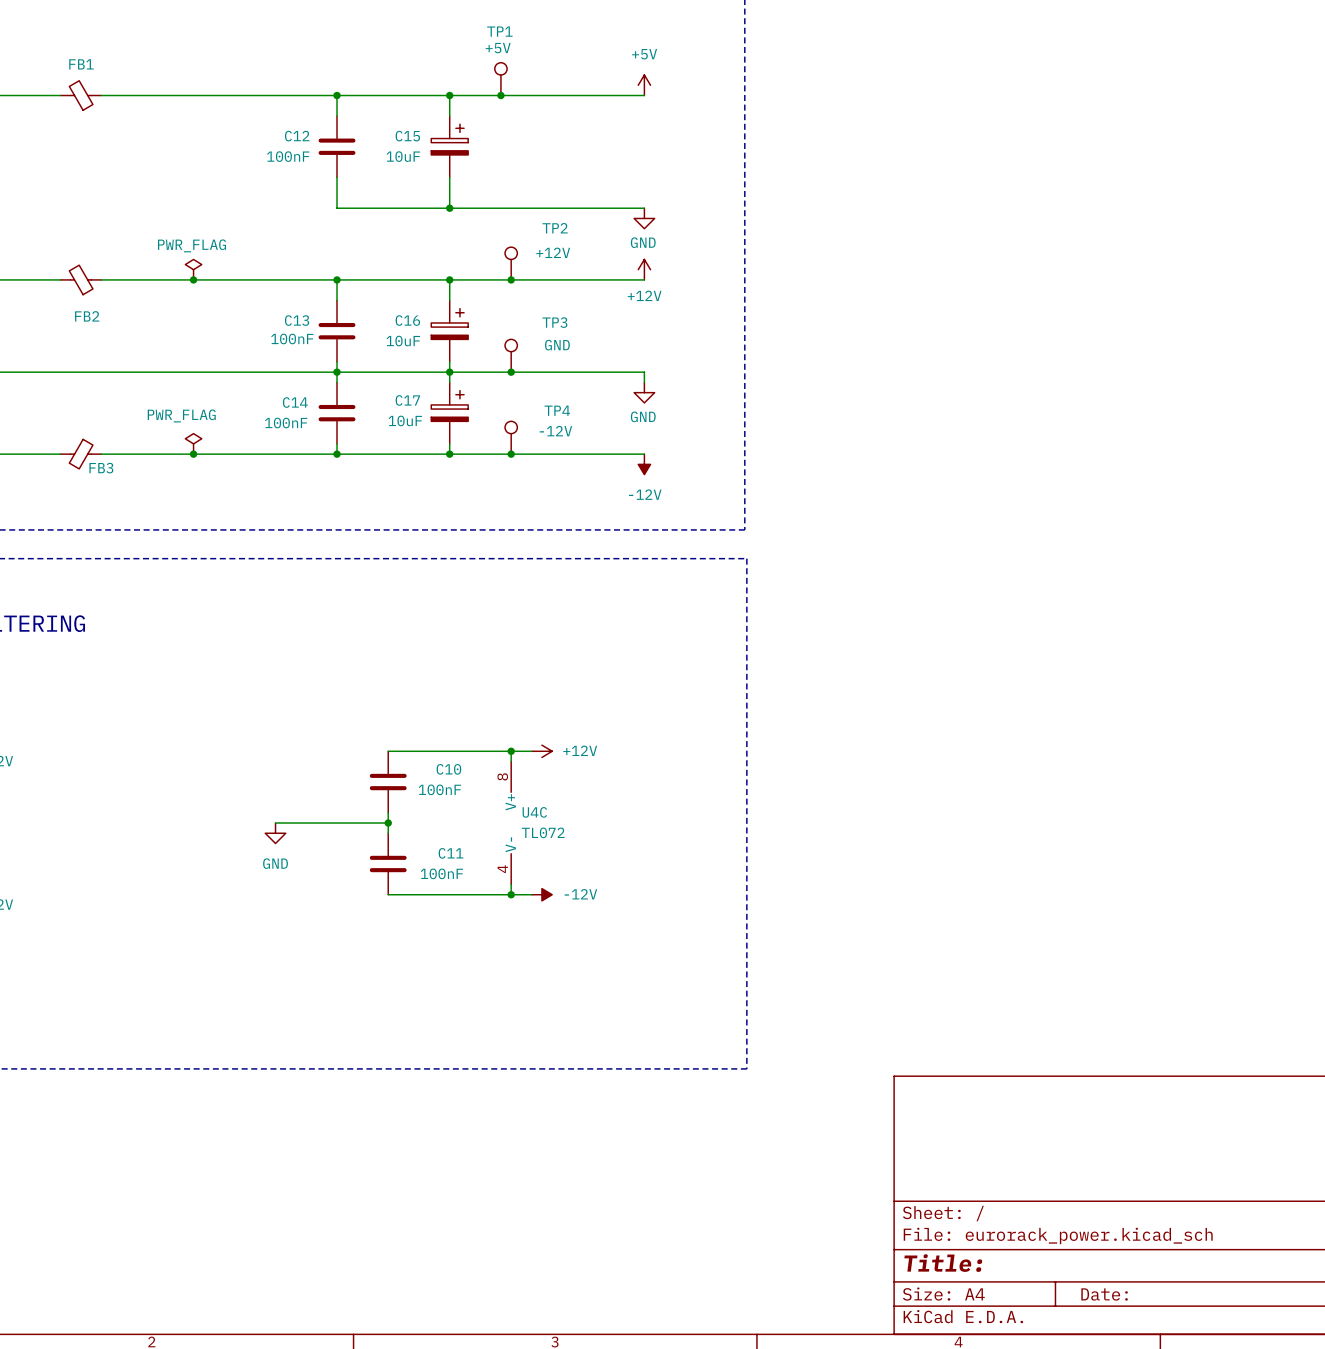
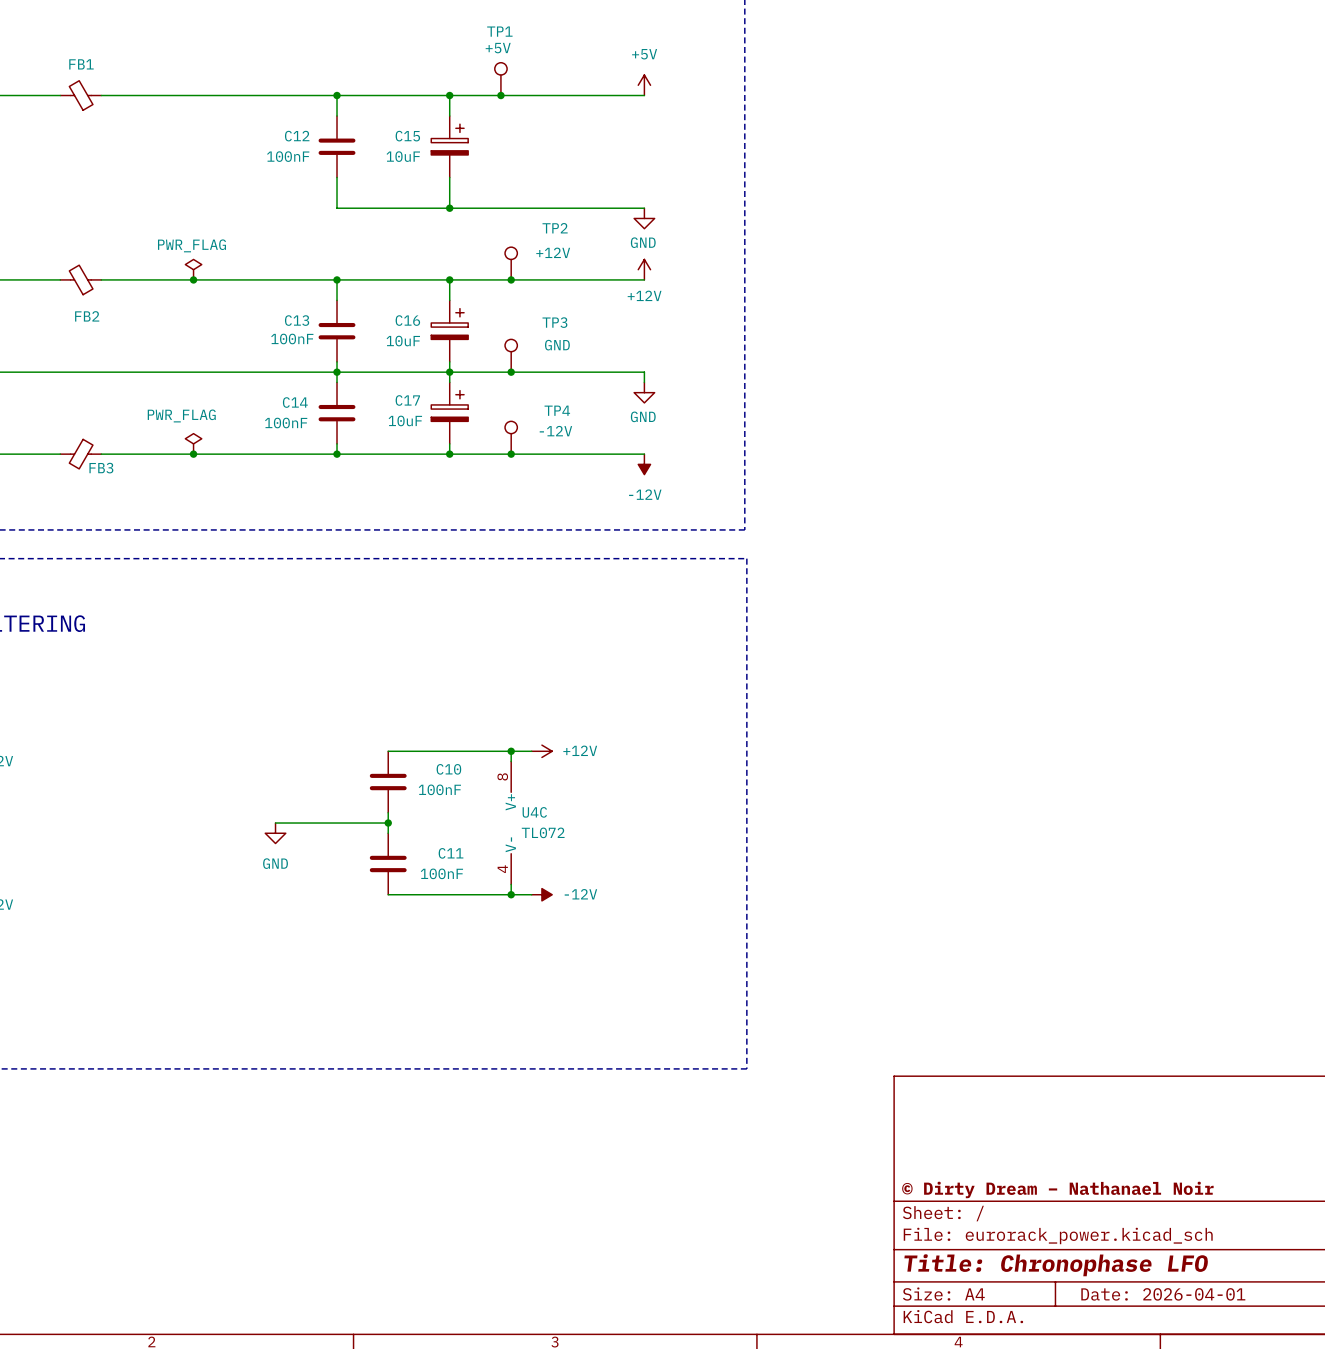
title block: none -> © Dirty Dream – Nathanael Noir (1057, 1189)
title block: Title: (943, 1263) -> Title: Chronophase LFO (1056, 1265)
title block: Date: (1104, 1294) -> Date: 2026-04-01 (1163, 1294)

